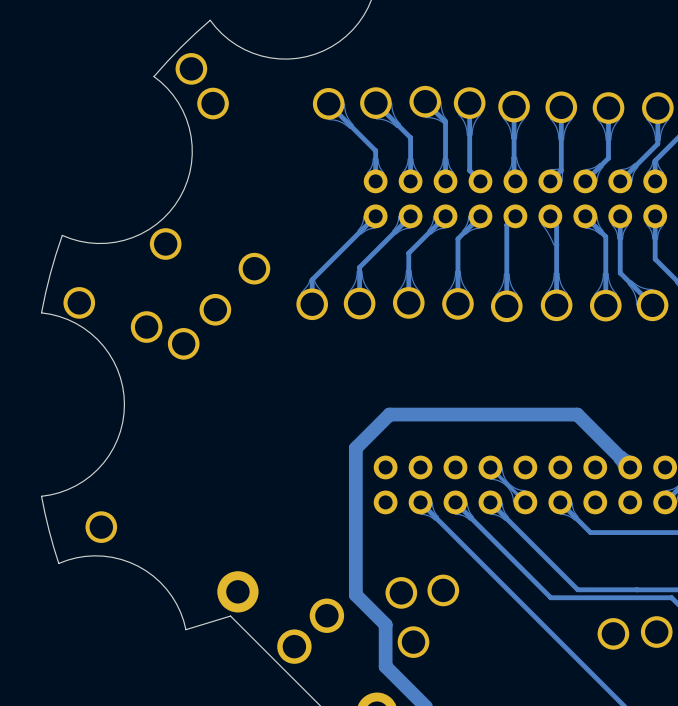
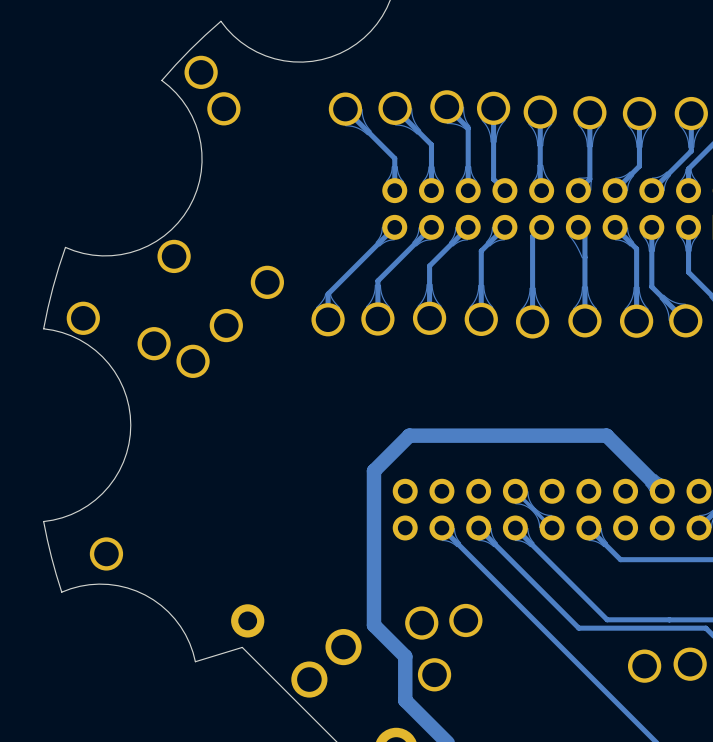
part footprint: [217, 571, 259, 613] -> [231, 604, 265, 638]

